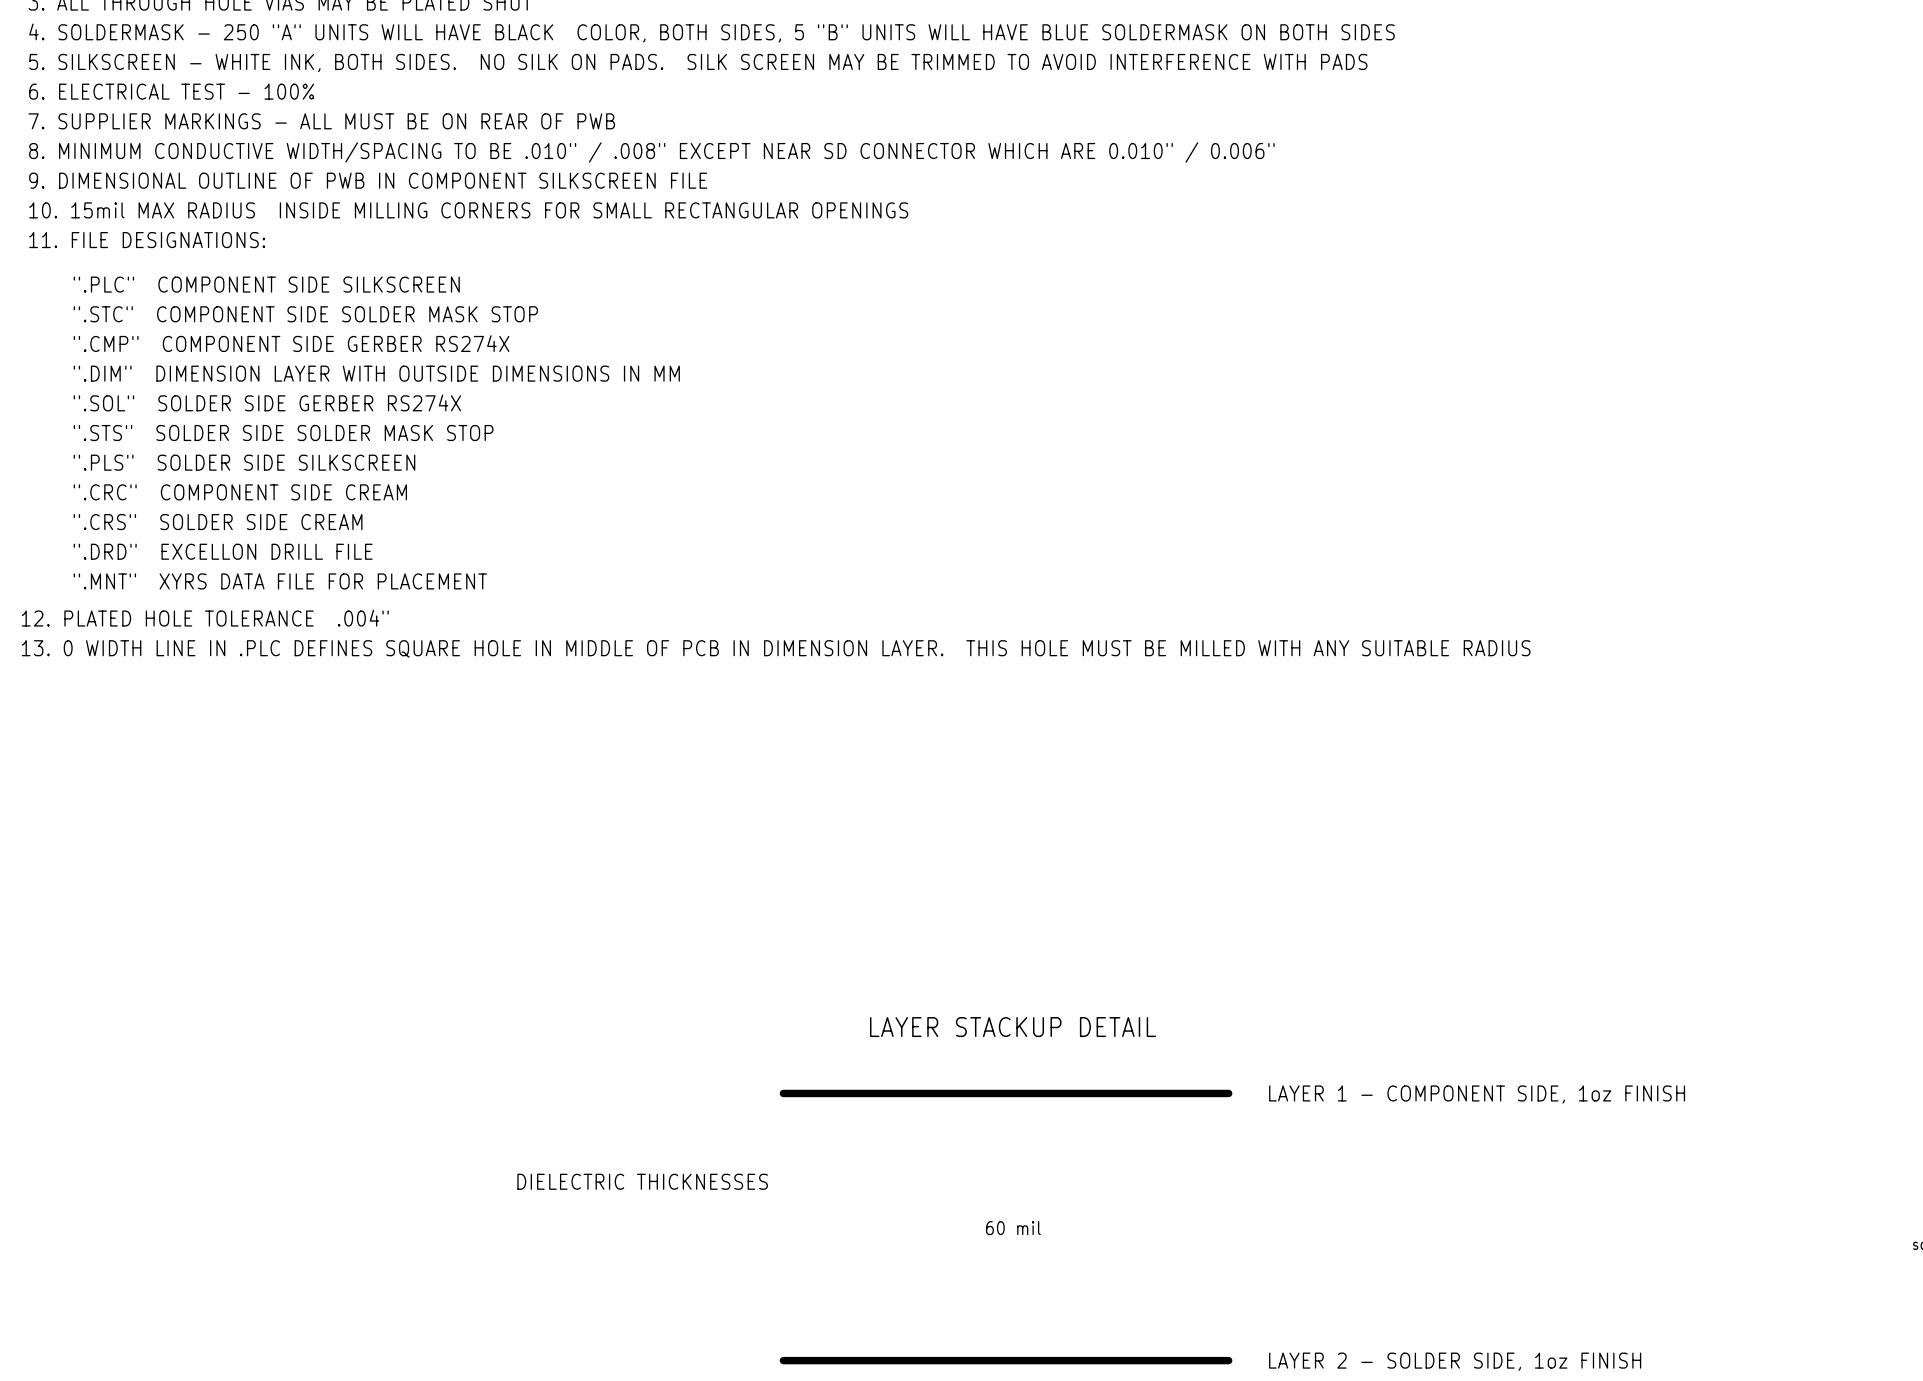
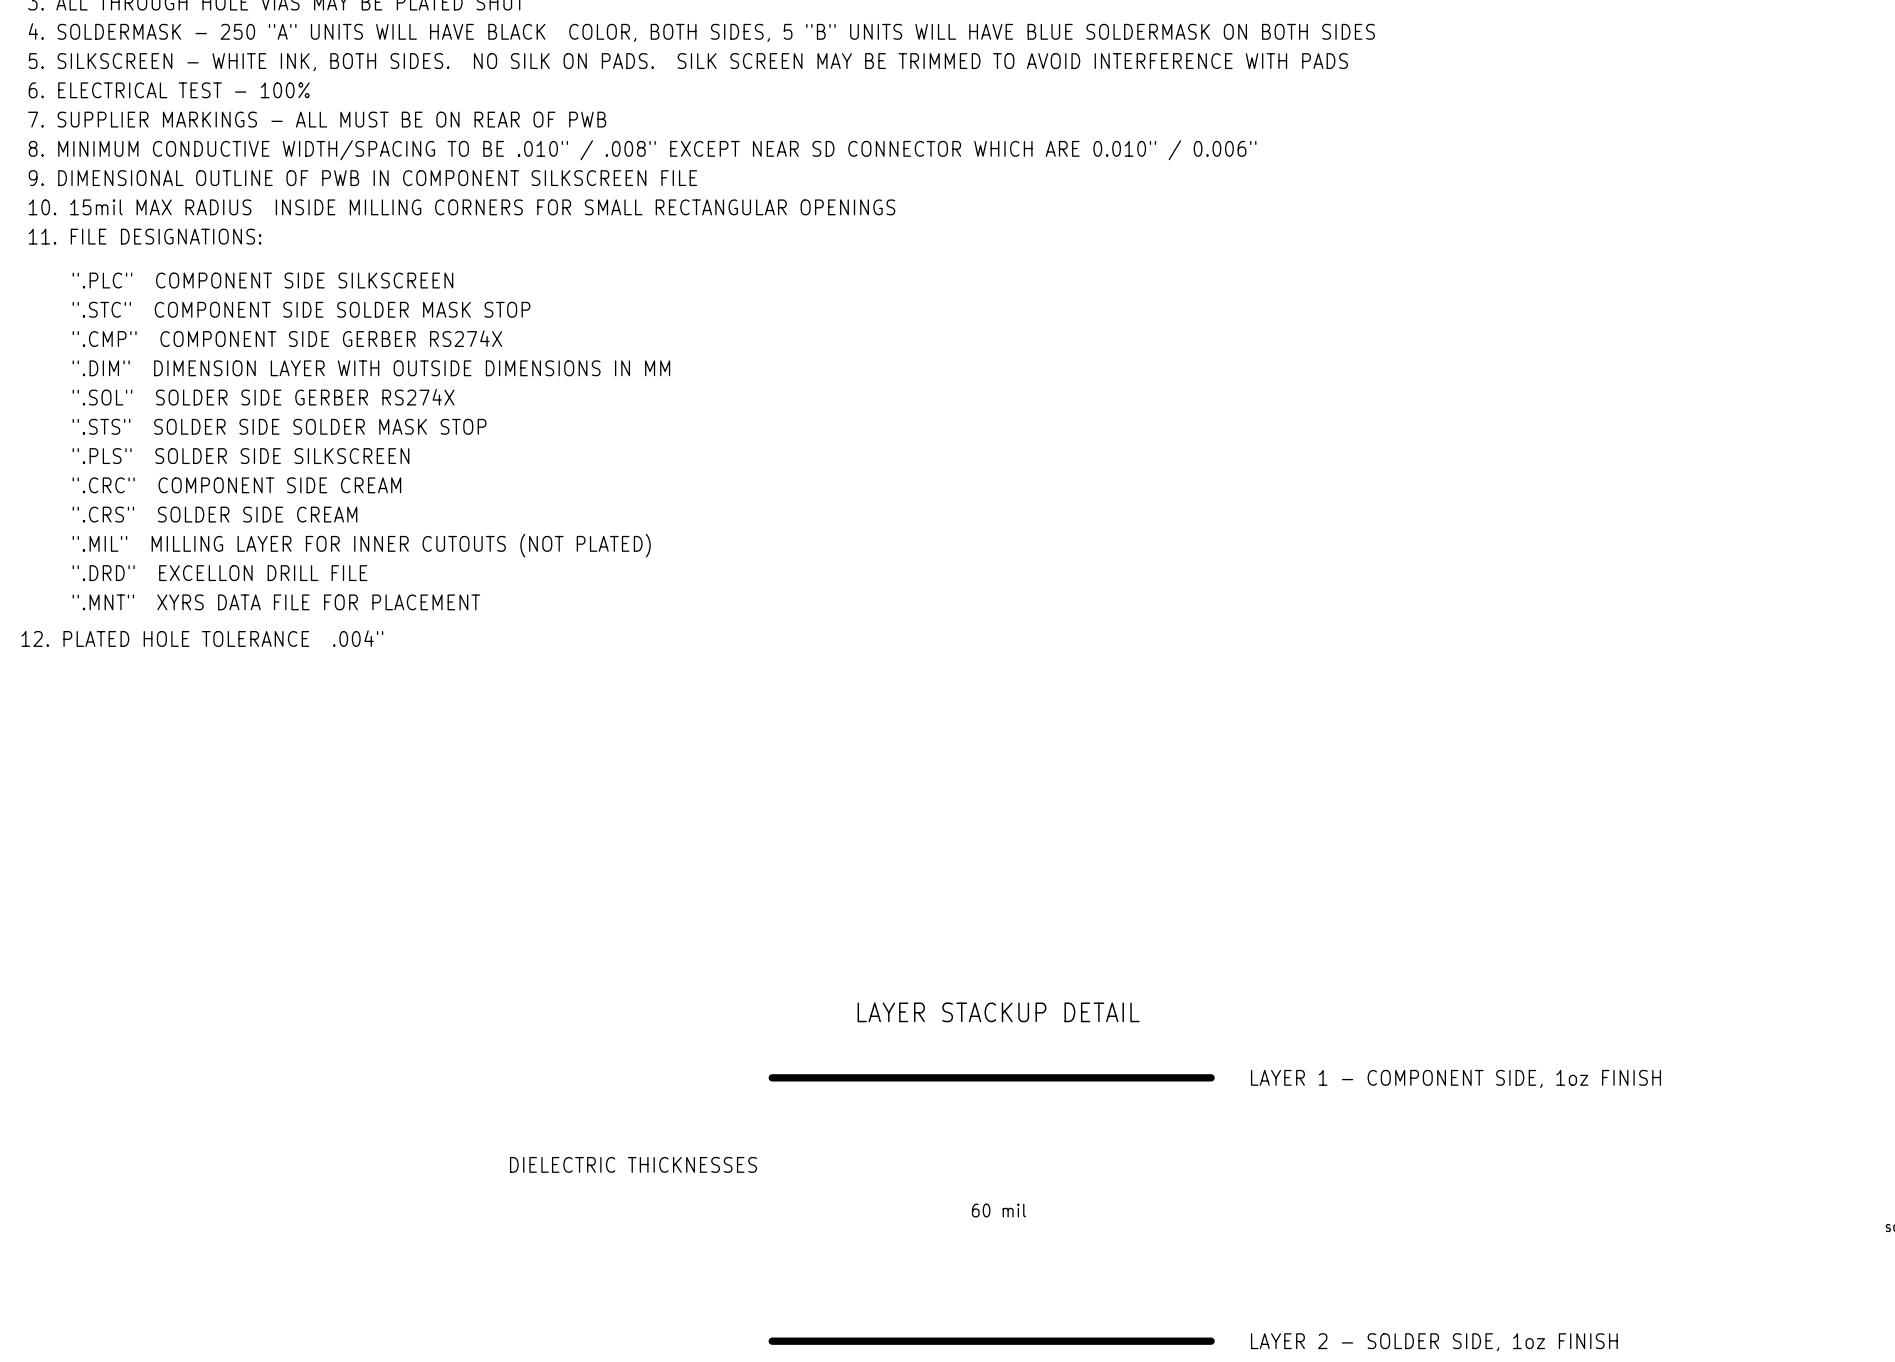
text: ".DRD" EXCELLON DRILL FILE (223, 551) -> ".MIL" MILLING LAYER FOR INNER CUTOUTS (NOT PLATED) (361, 545)
text: ".MNT" XYRS DATA FILE FOR PLACEMENT (280, 581) -> ".DRD" EXCELLON DRILL FILE (219, 573)
text: none -> ".MNT" XYRS DATA FILE FOR PLACEMENT (276, 602)
text: 12. PLATED HOLE TOLERANCE .004" (205, 618) -> none
text: 13. 0 WIDTH LINE IN .PLC DEFINES SQUARE HOLE IN MIDDLE OF PCB IN DIMENSION LAYER. THIS HOLE MUST BE MILLED WITH ANY SUITABLE RADIUS (776, 648) -> 12. PLATED HOLE TOLERANCE .004" (202, 638)

